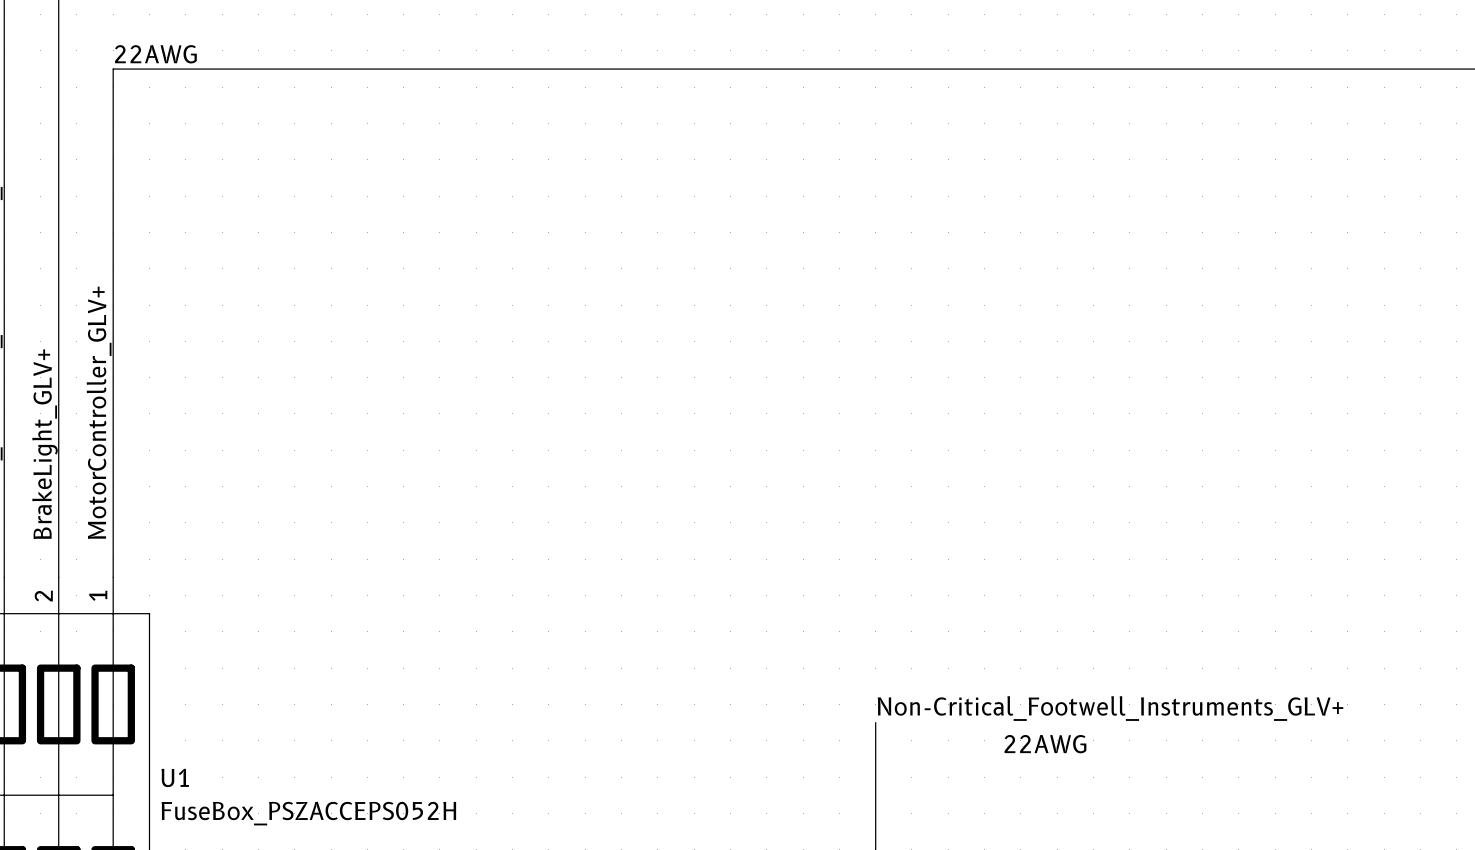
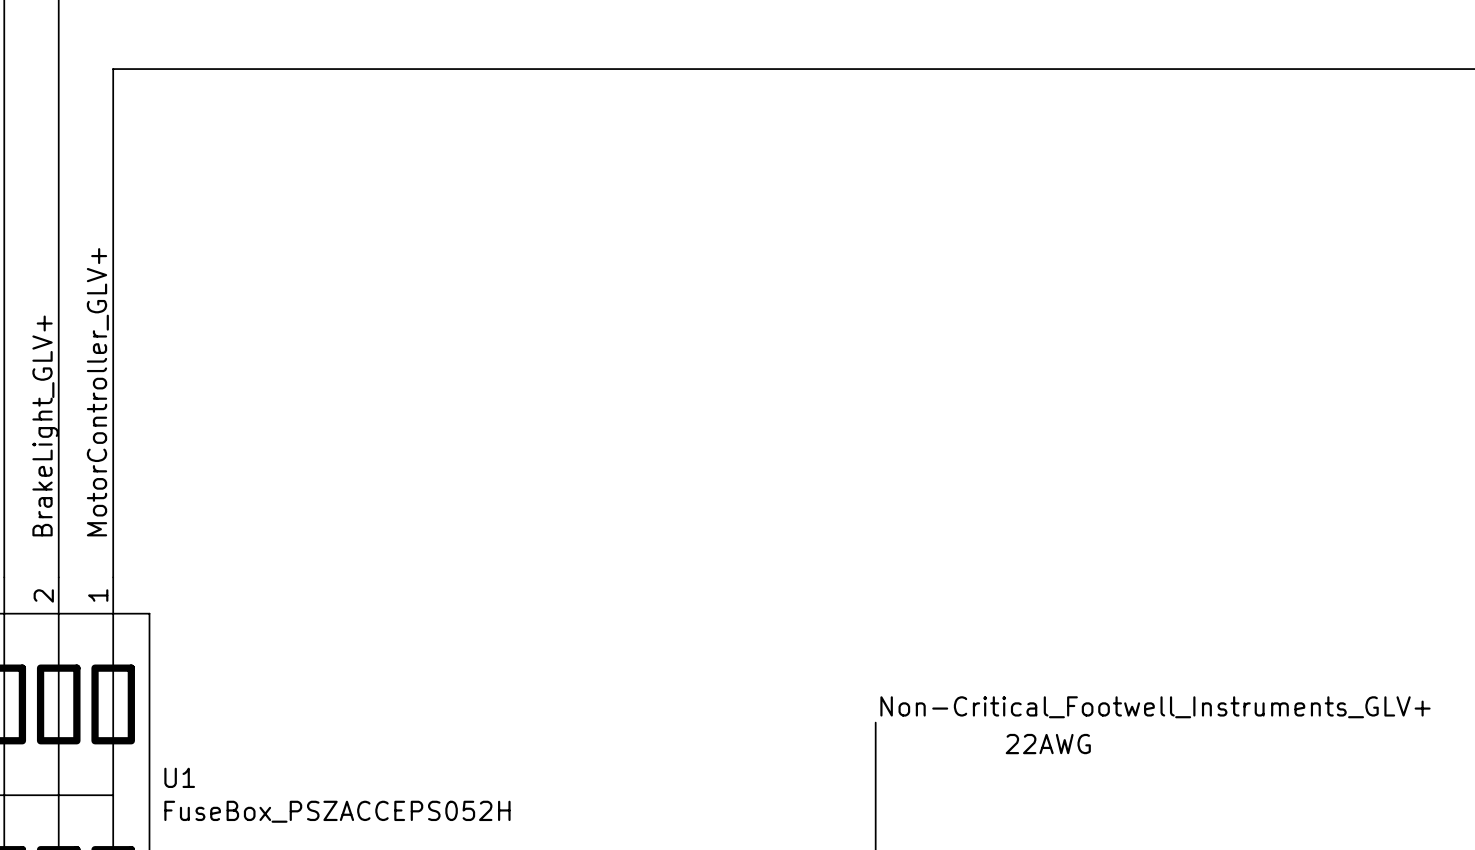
text: 22AWG (155, 54) -> none

